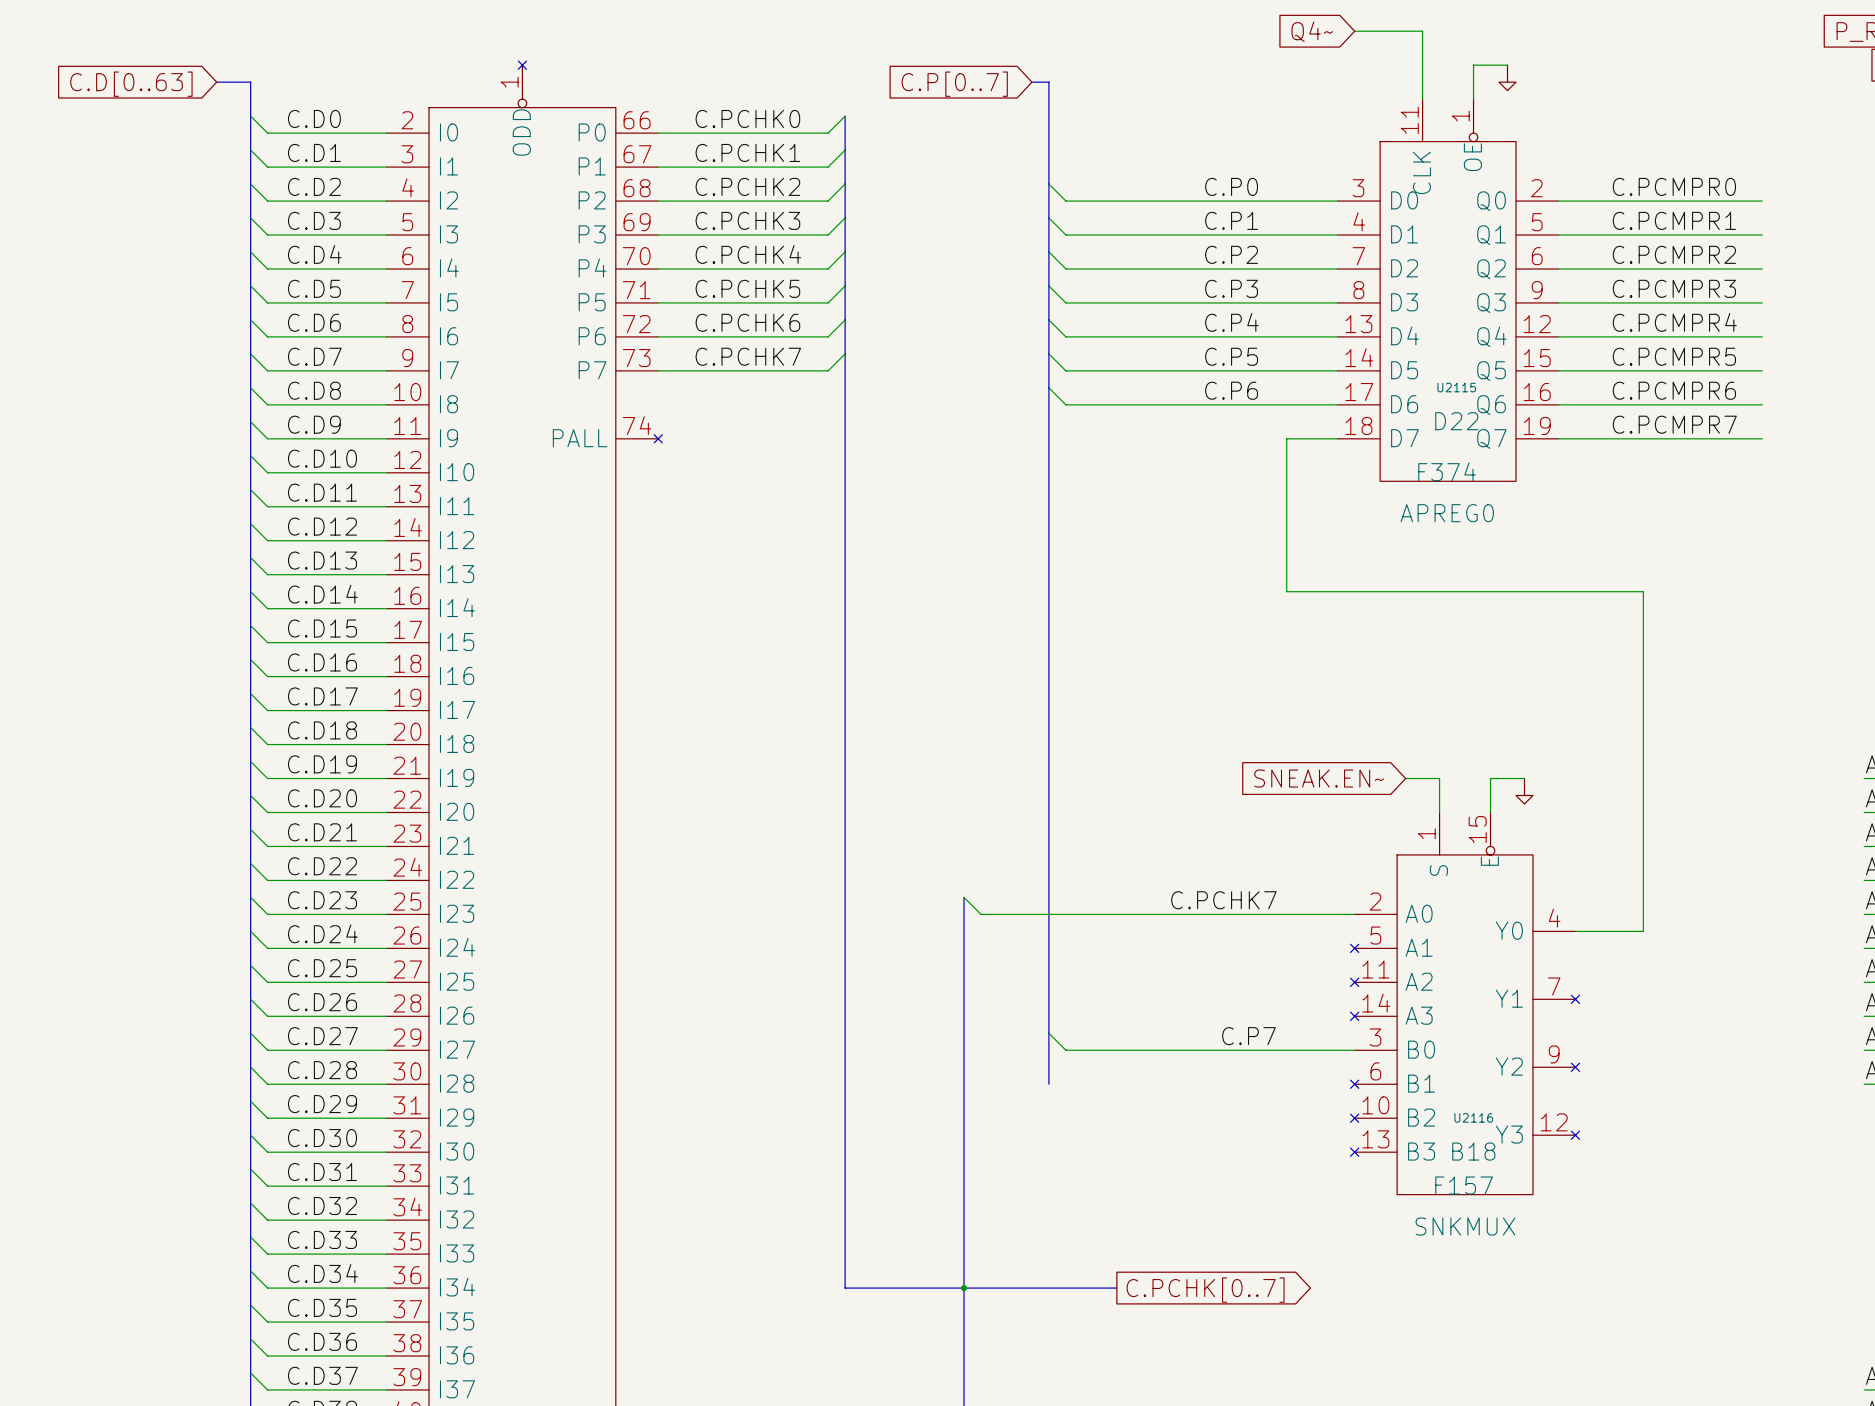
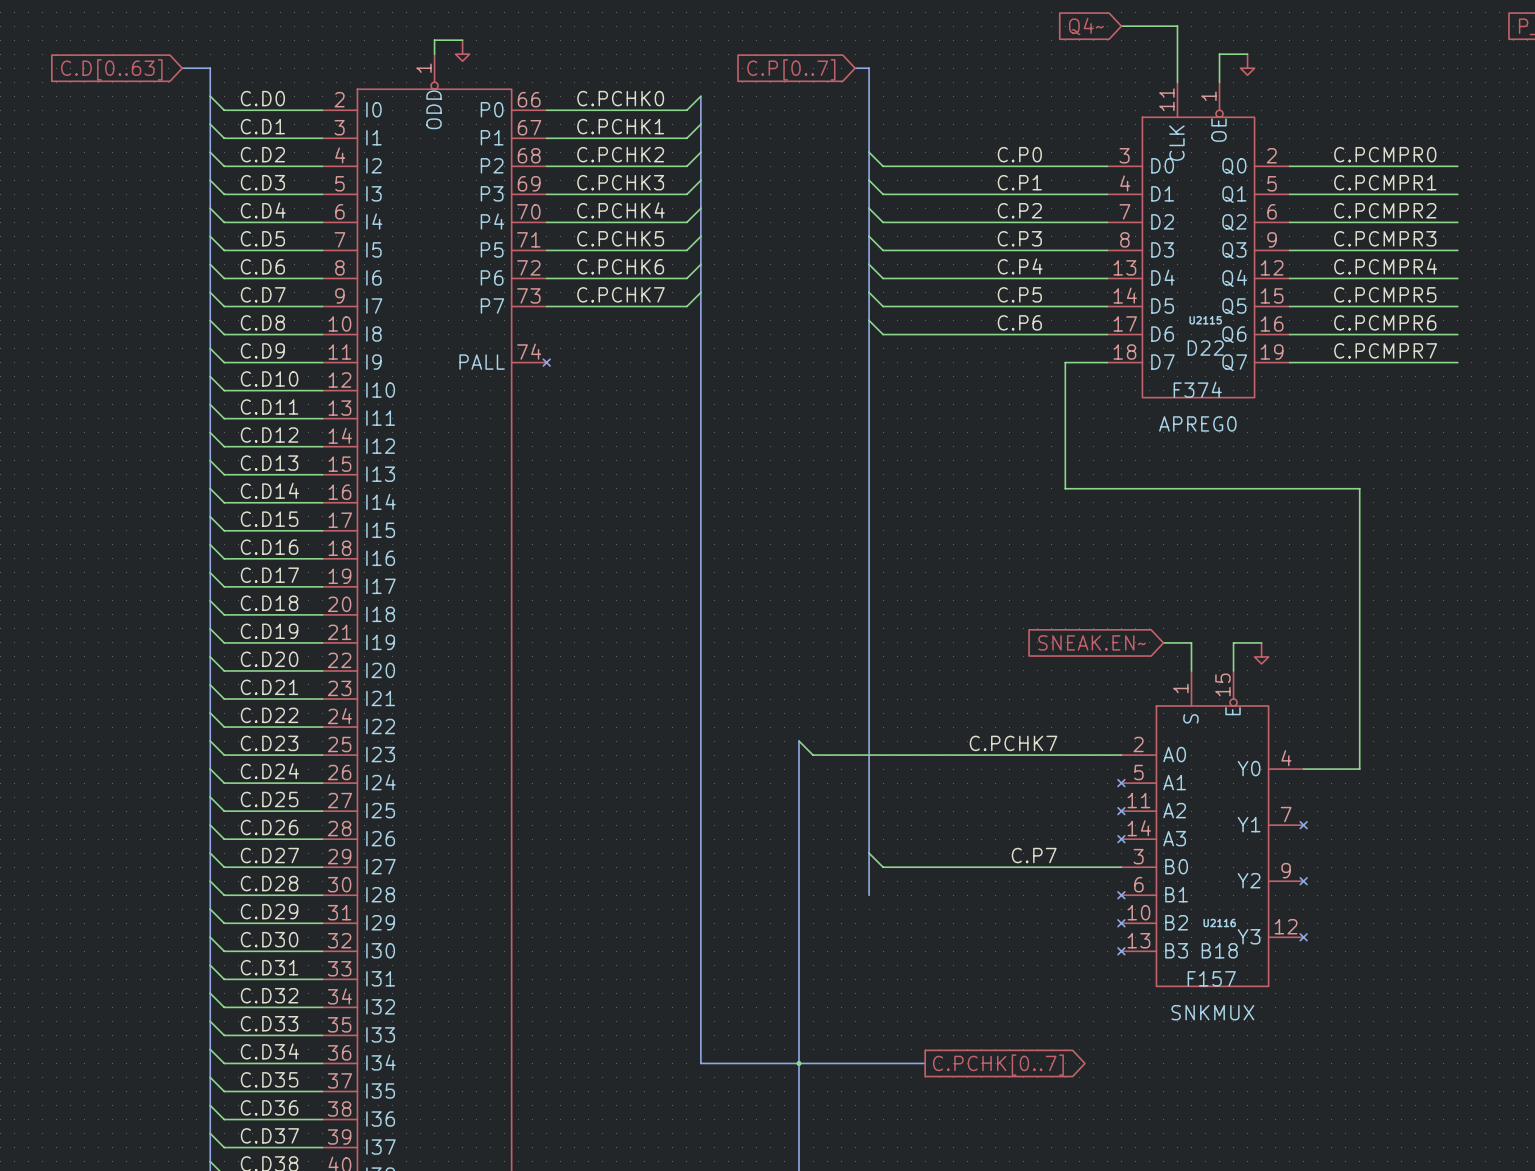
wire: none -> (462, 40) (434, 40) (434, 54)
power symbol: none -> (462, 50)
no-connect mark: (522, 65) -> none

